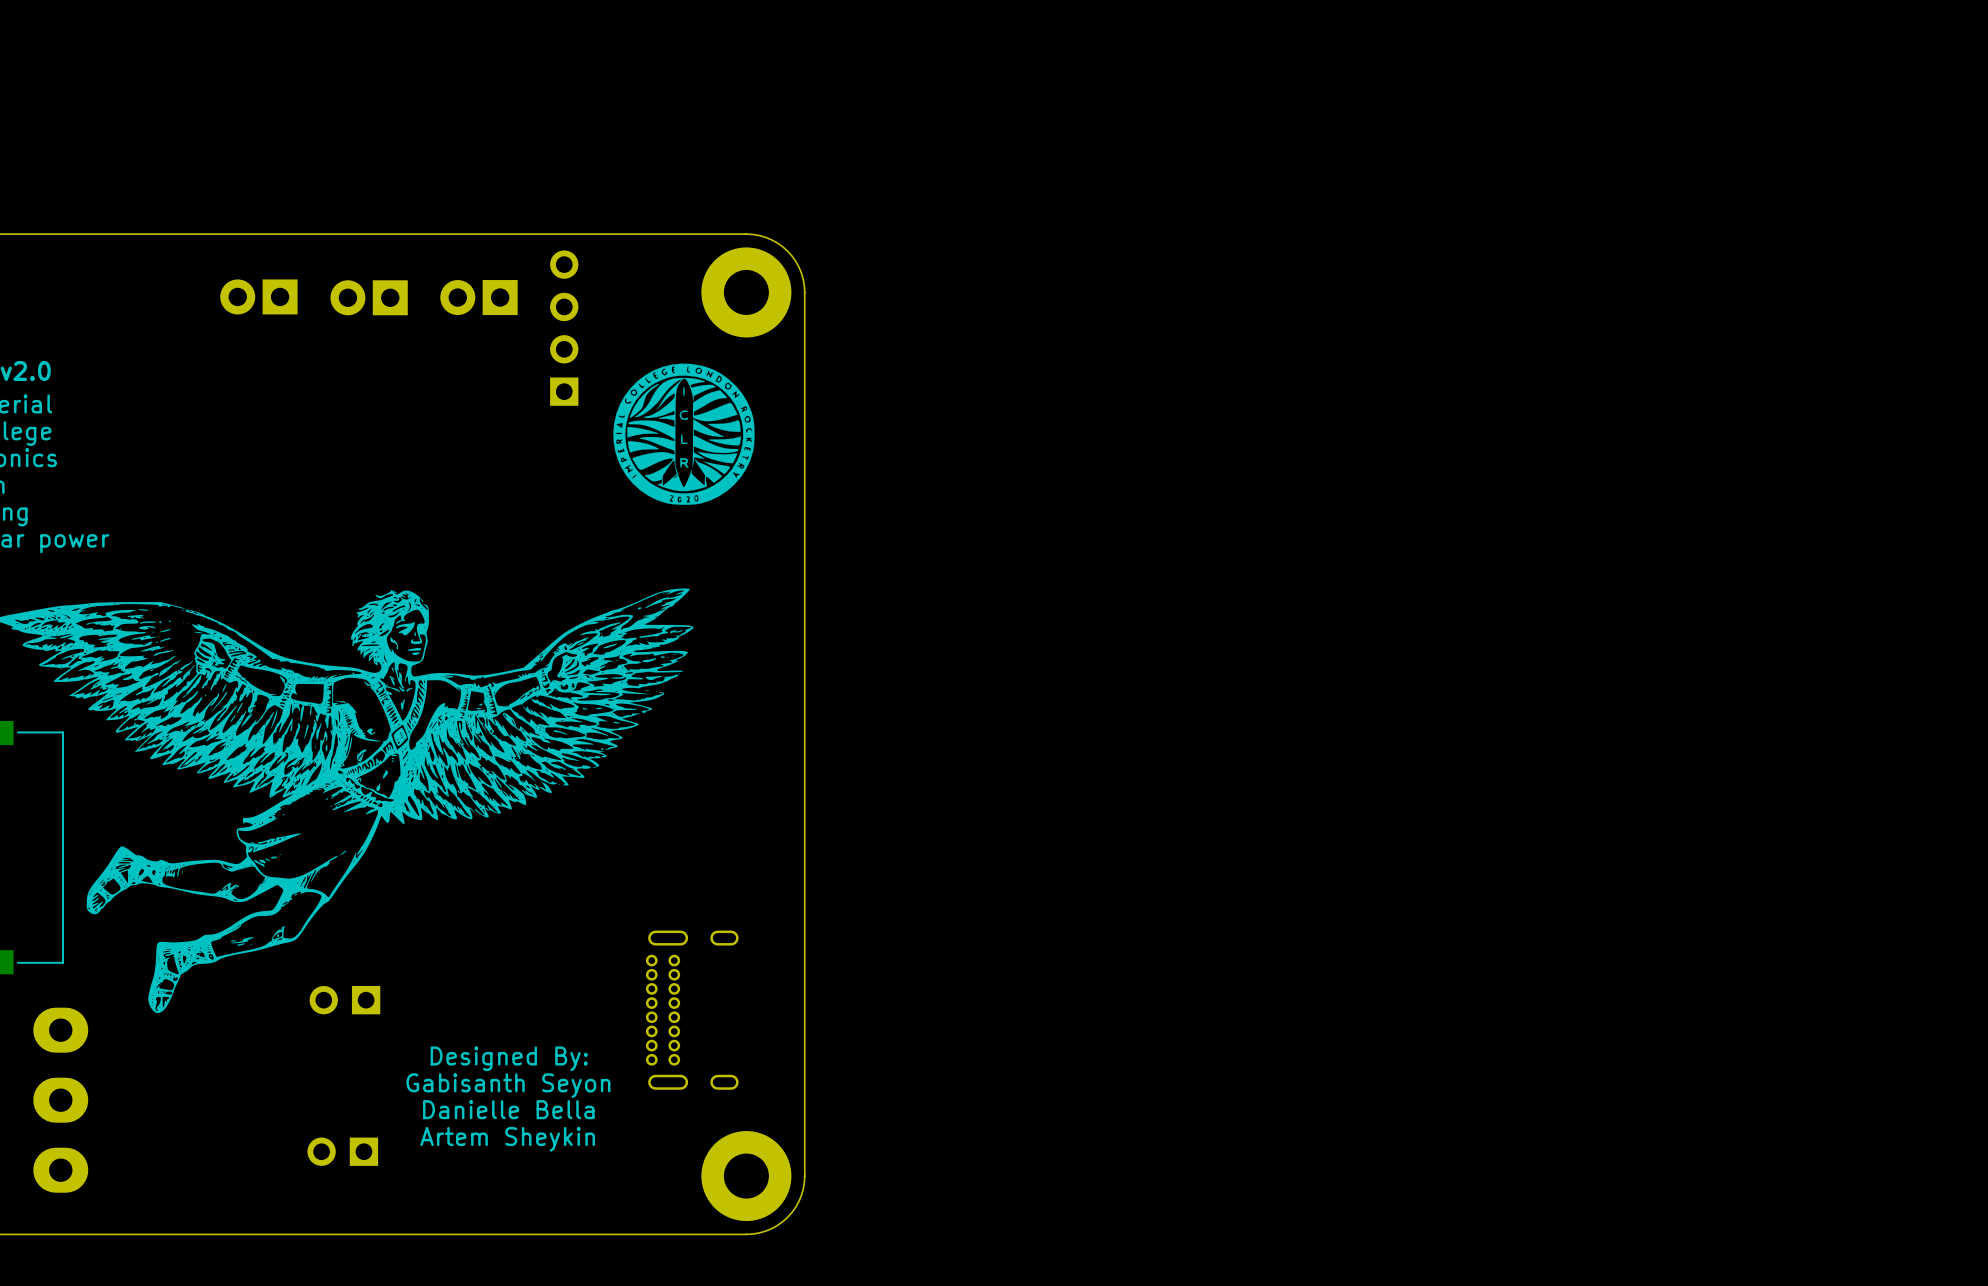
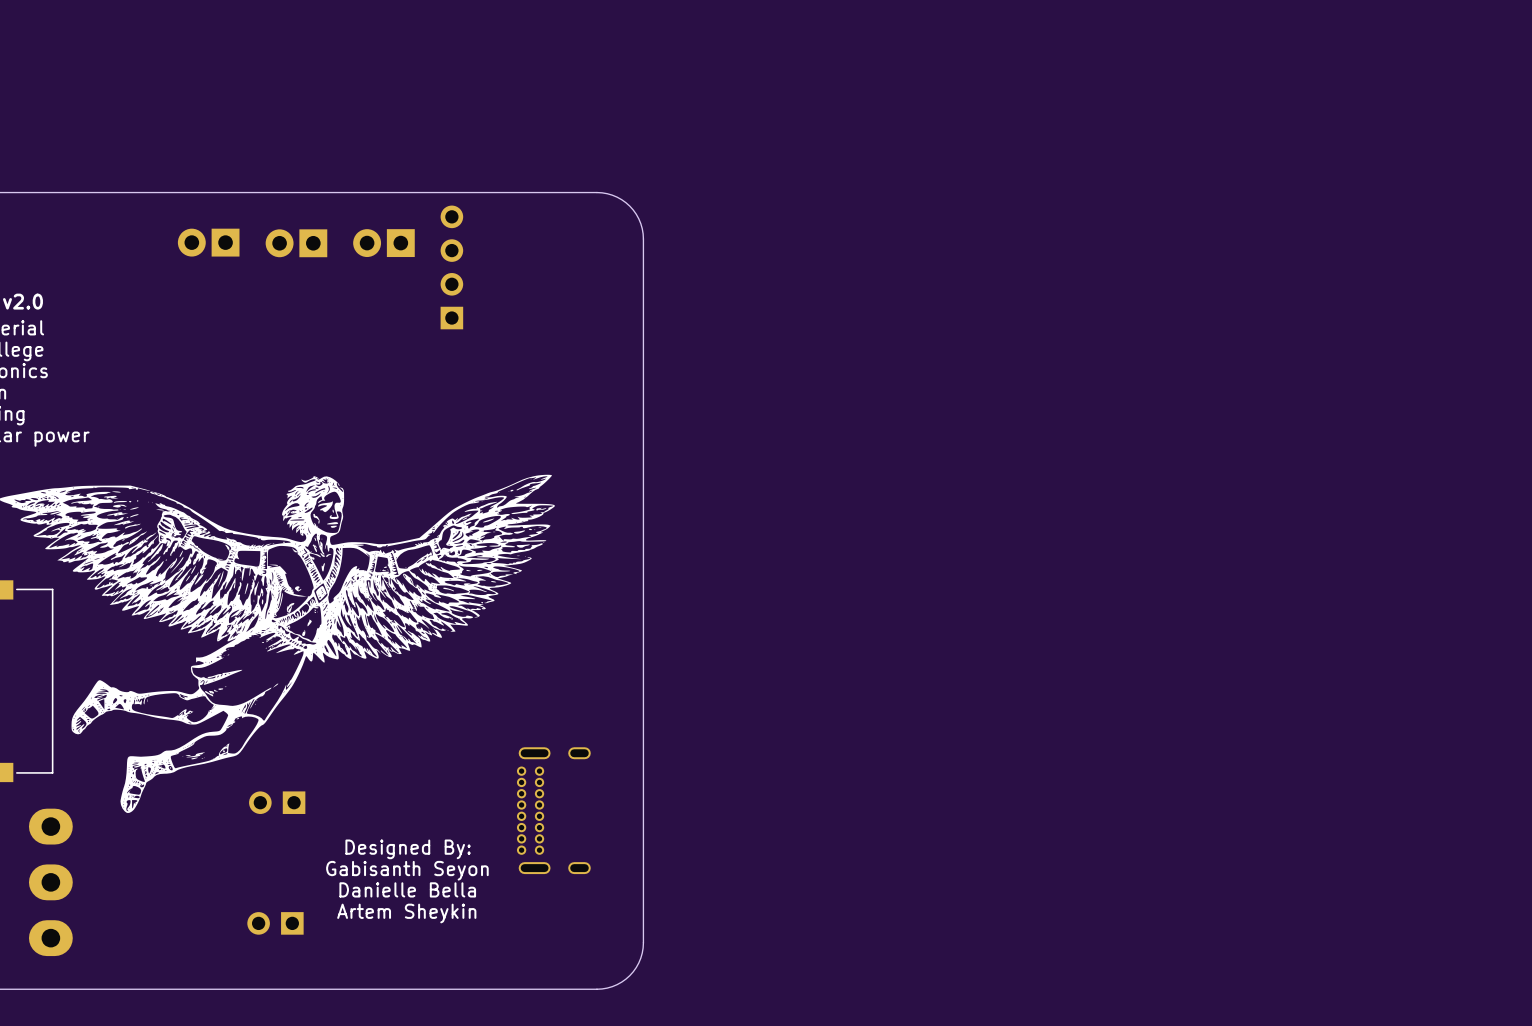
part: (746, 292) -> none
drawing: [613, 363, 755, 505] -> none
part: (746, 1176) -> none

